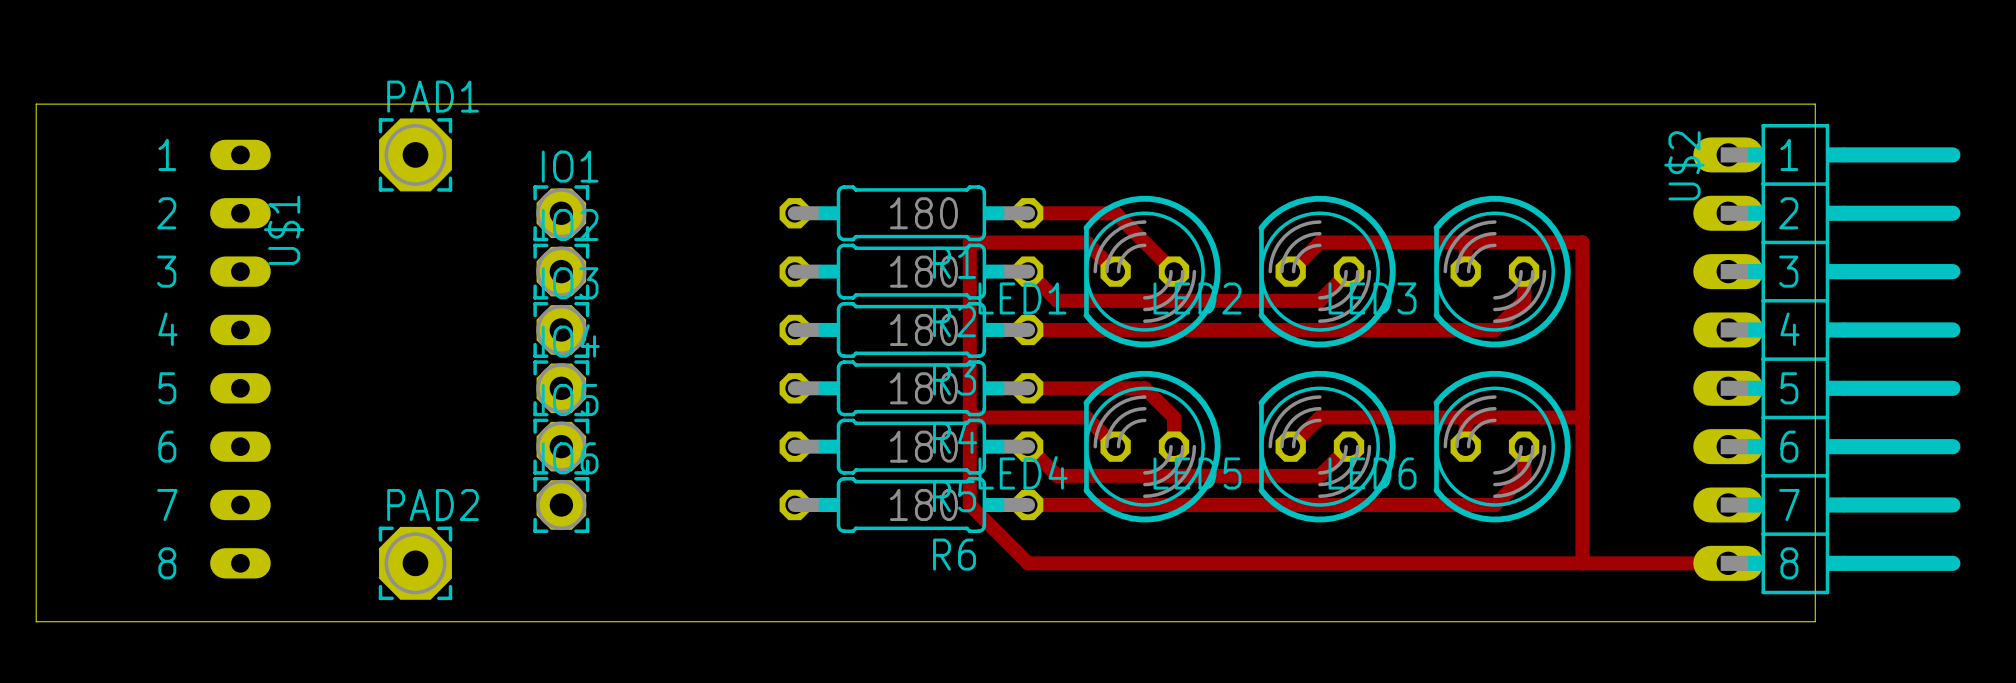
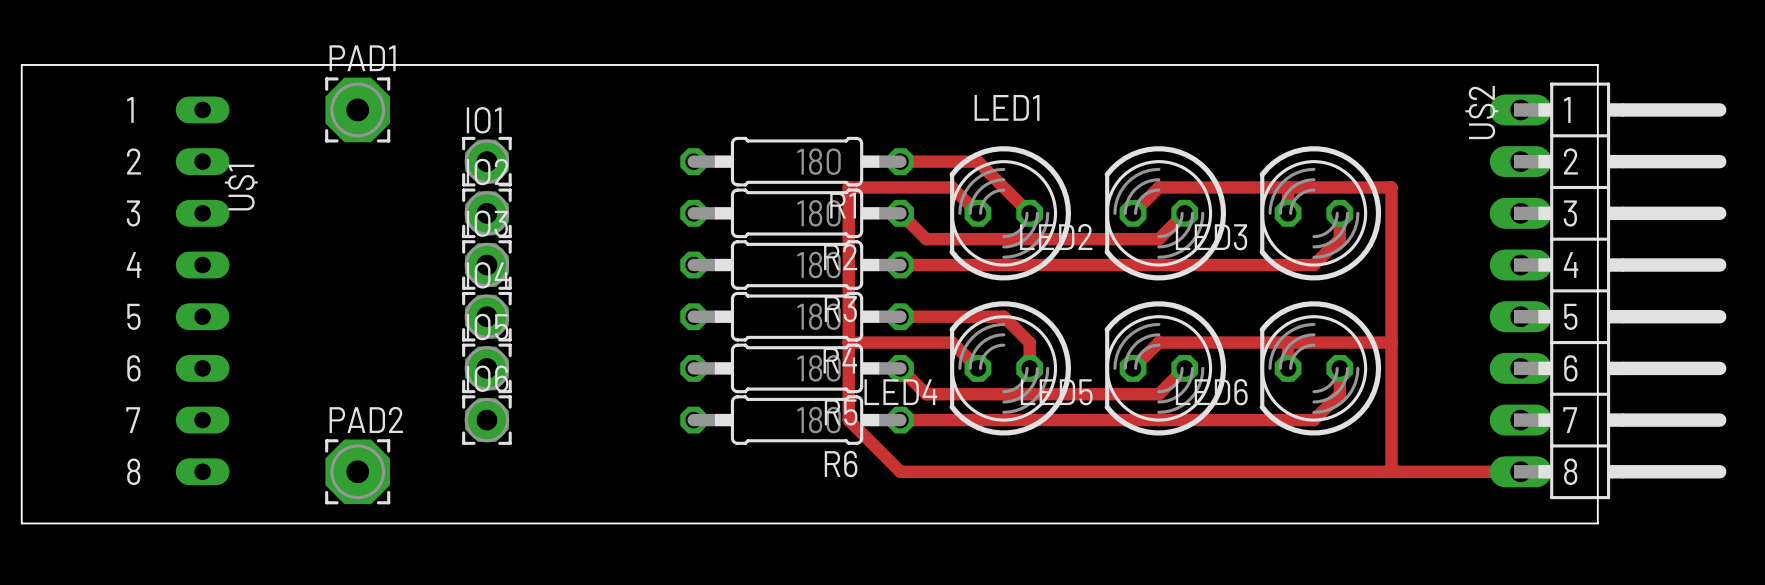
LED1 name position: LED1 (1022, 298) -> LED1 (1007, 107)

